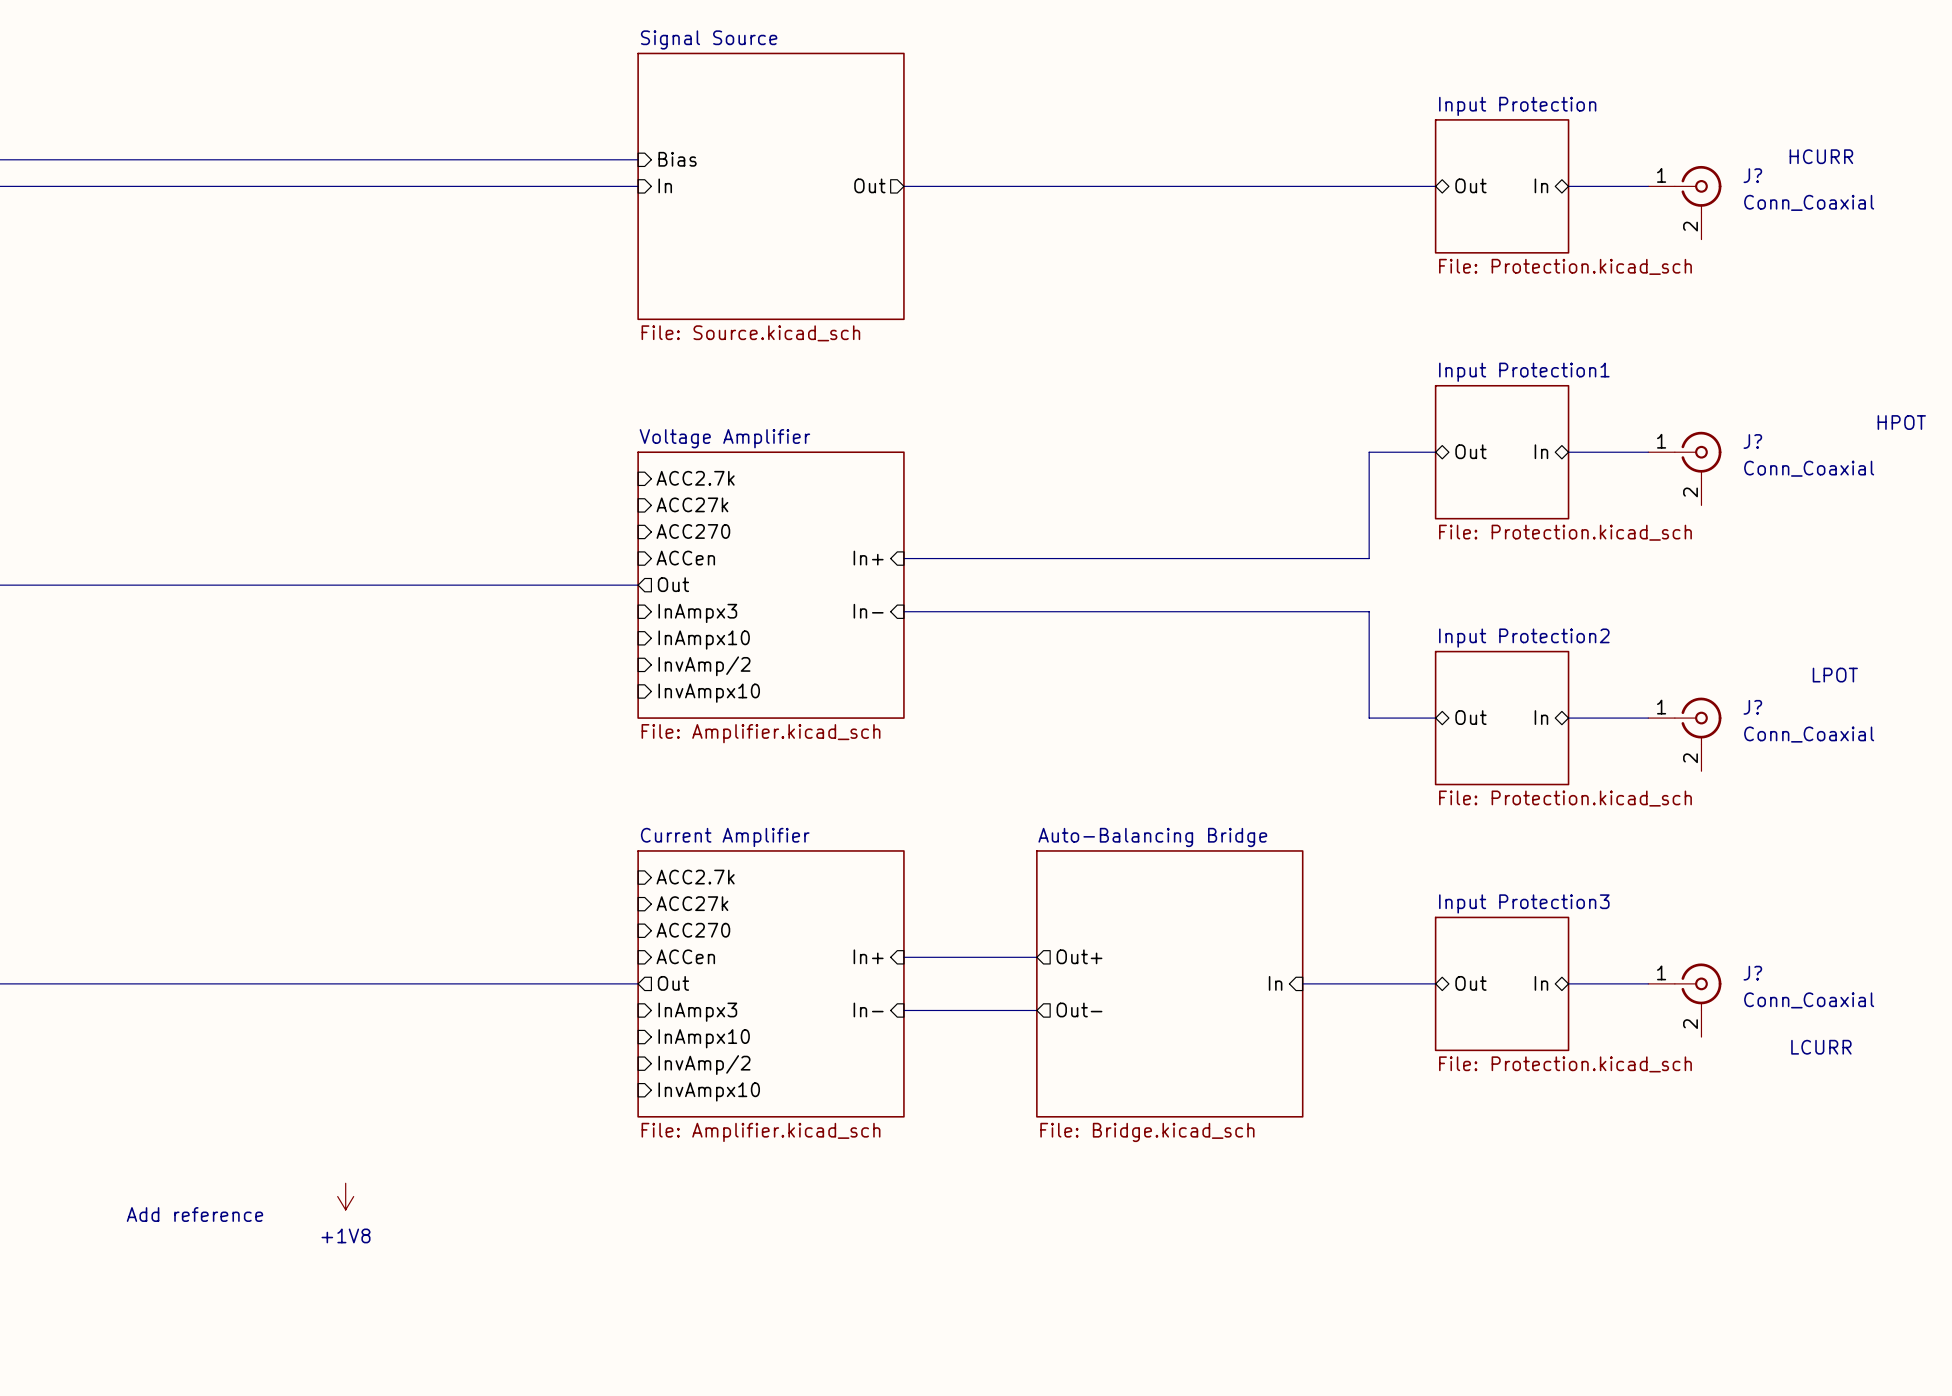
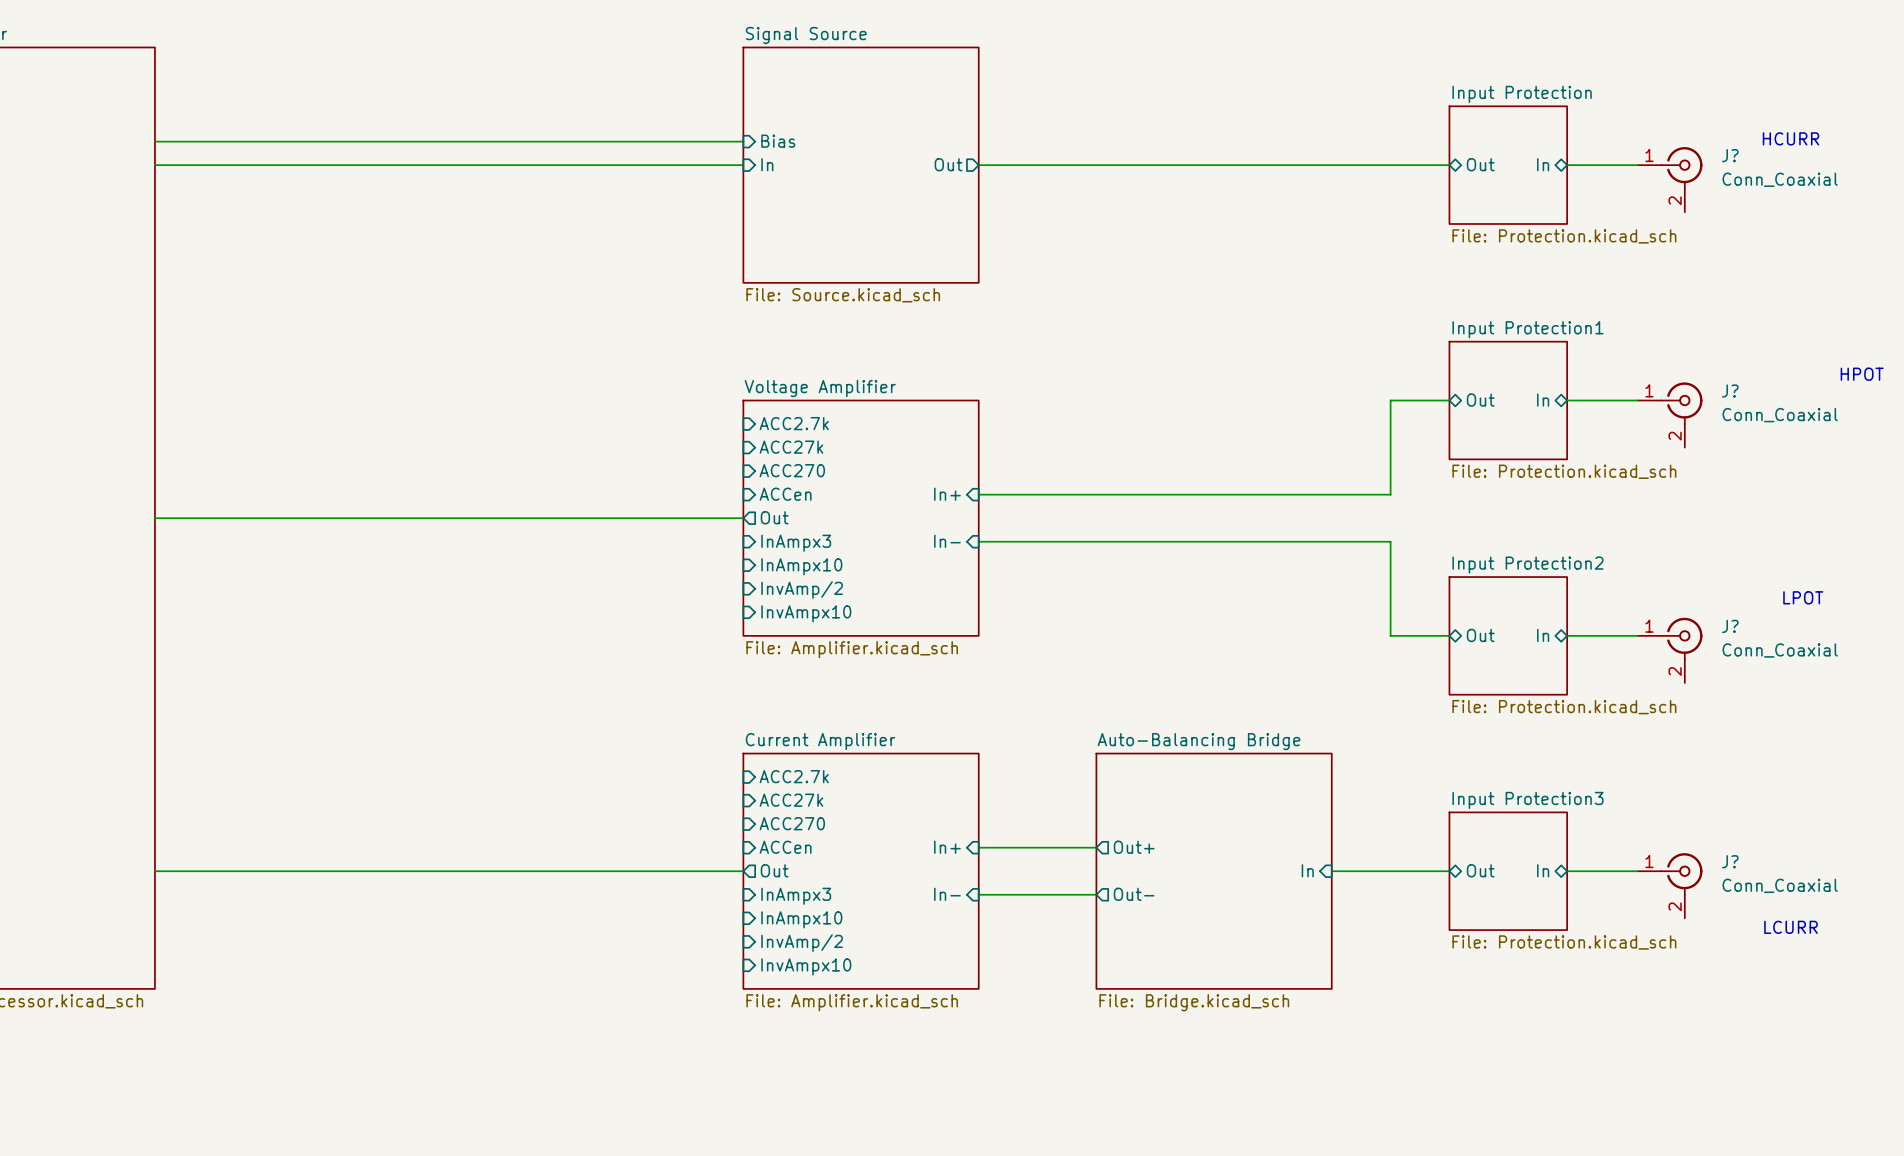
power symbol: +1V8 (345, 1196) -> none
text: Add reference (194, 1214) -> none

